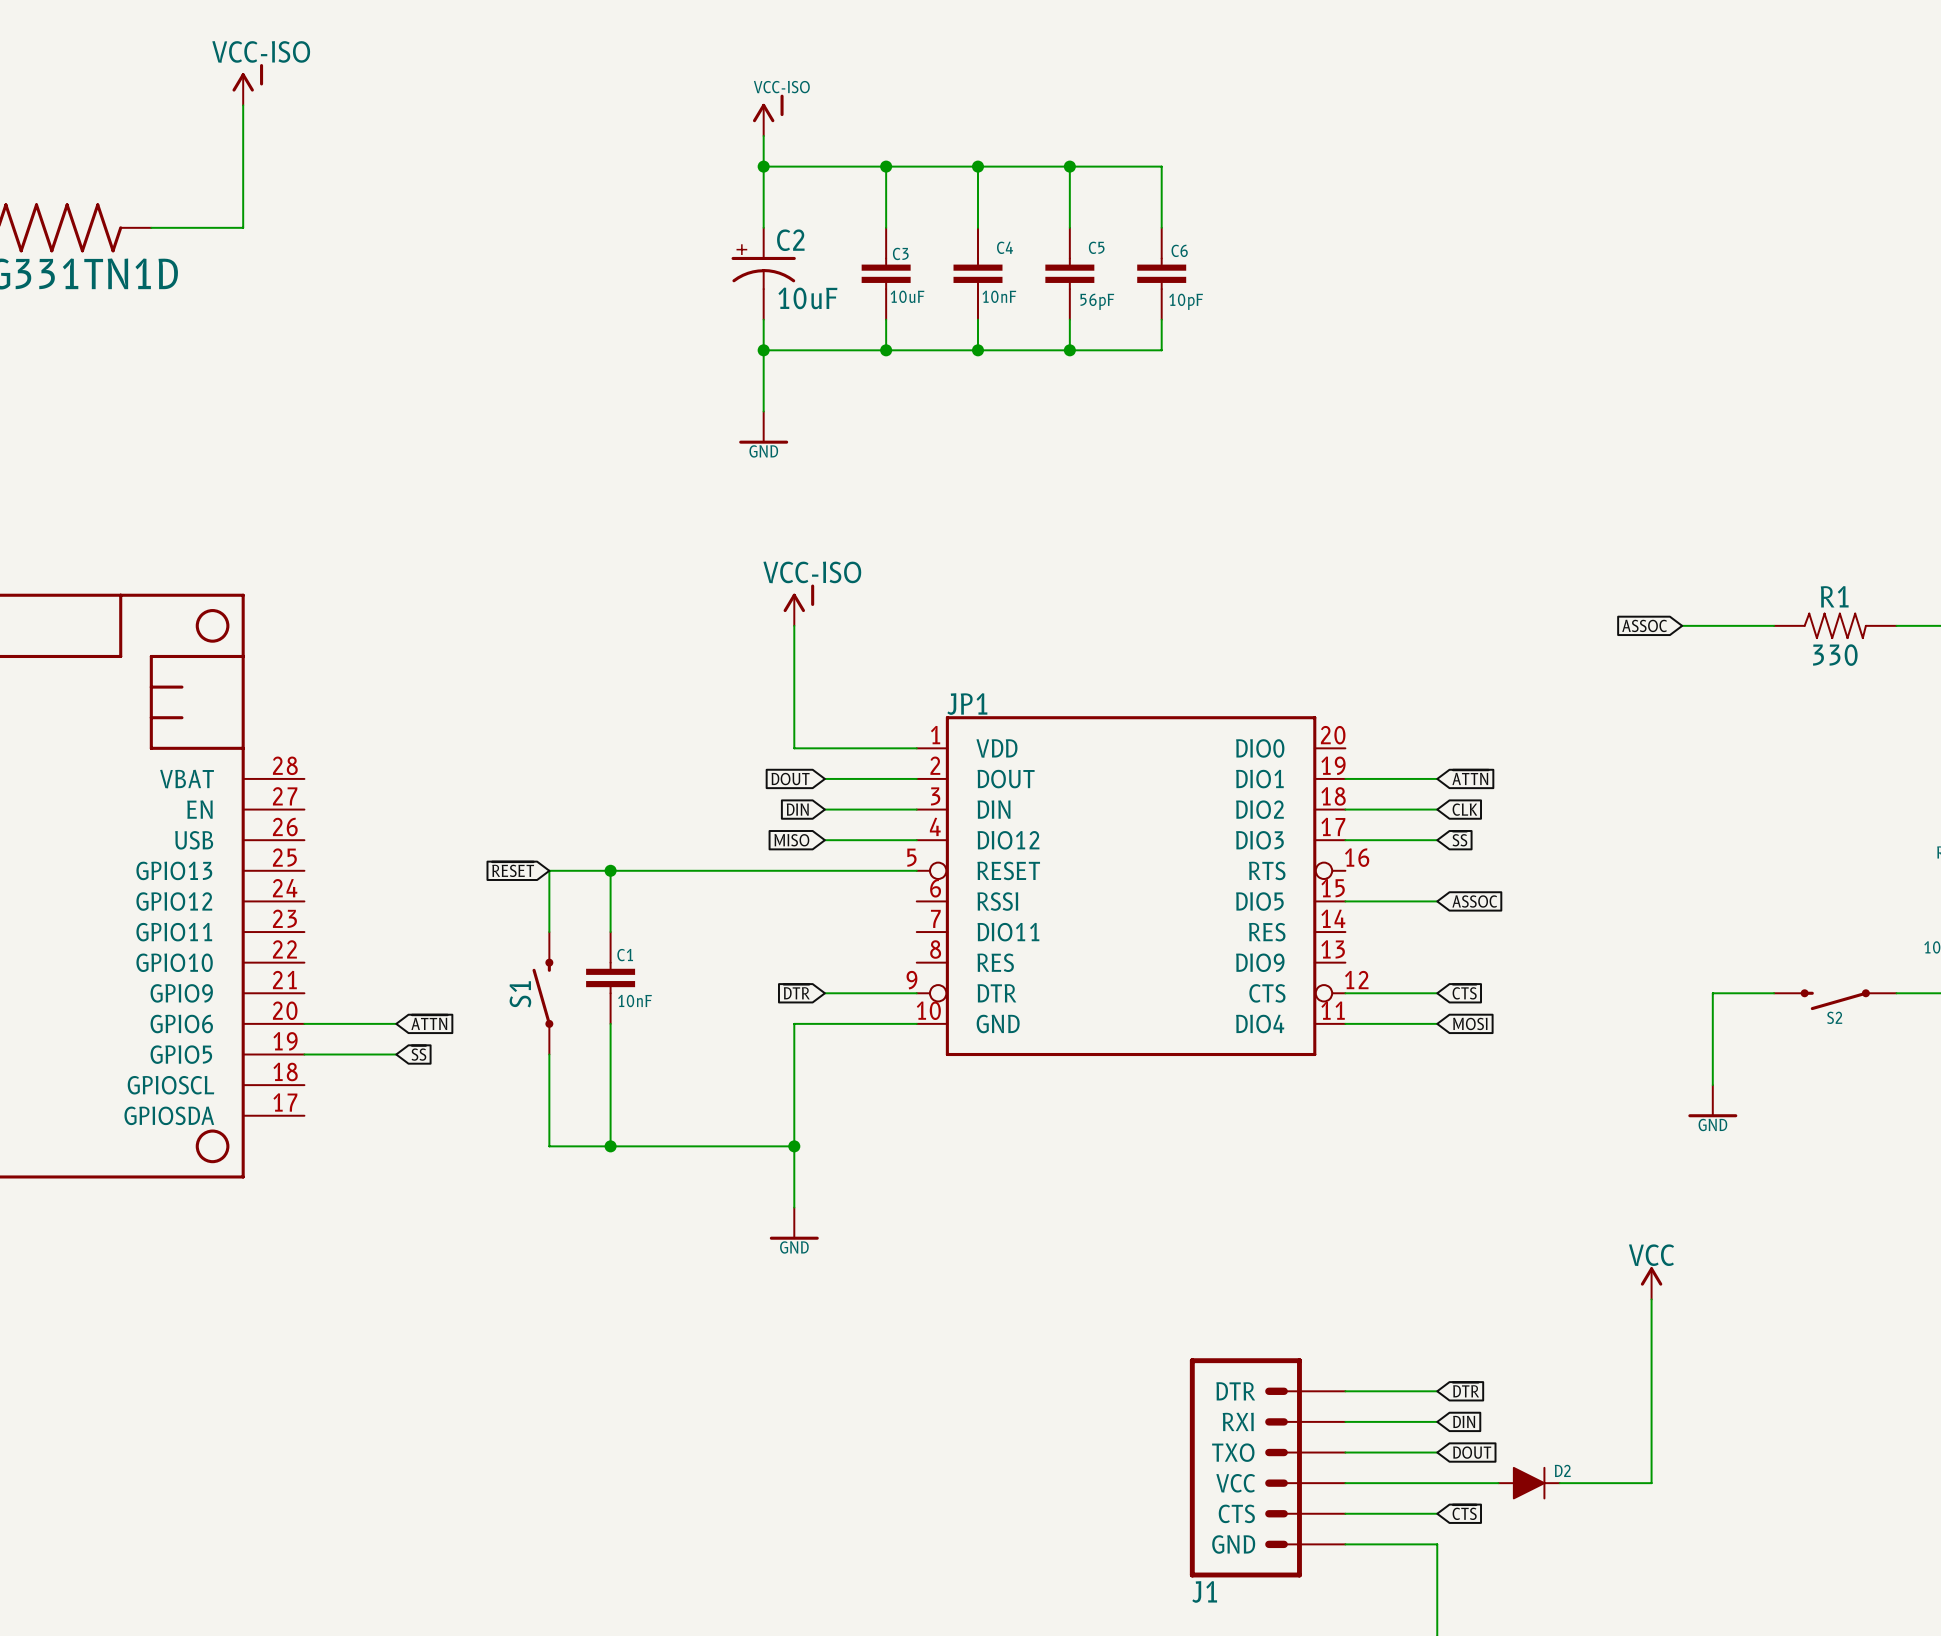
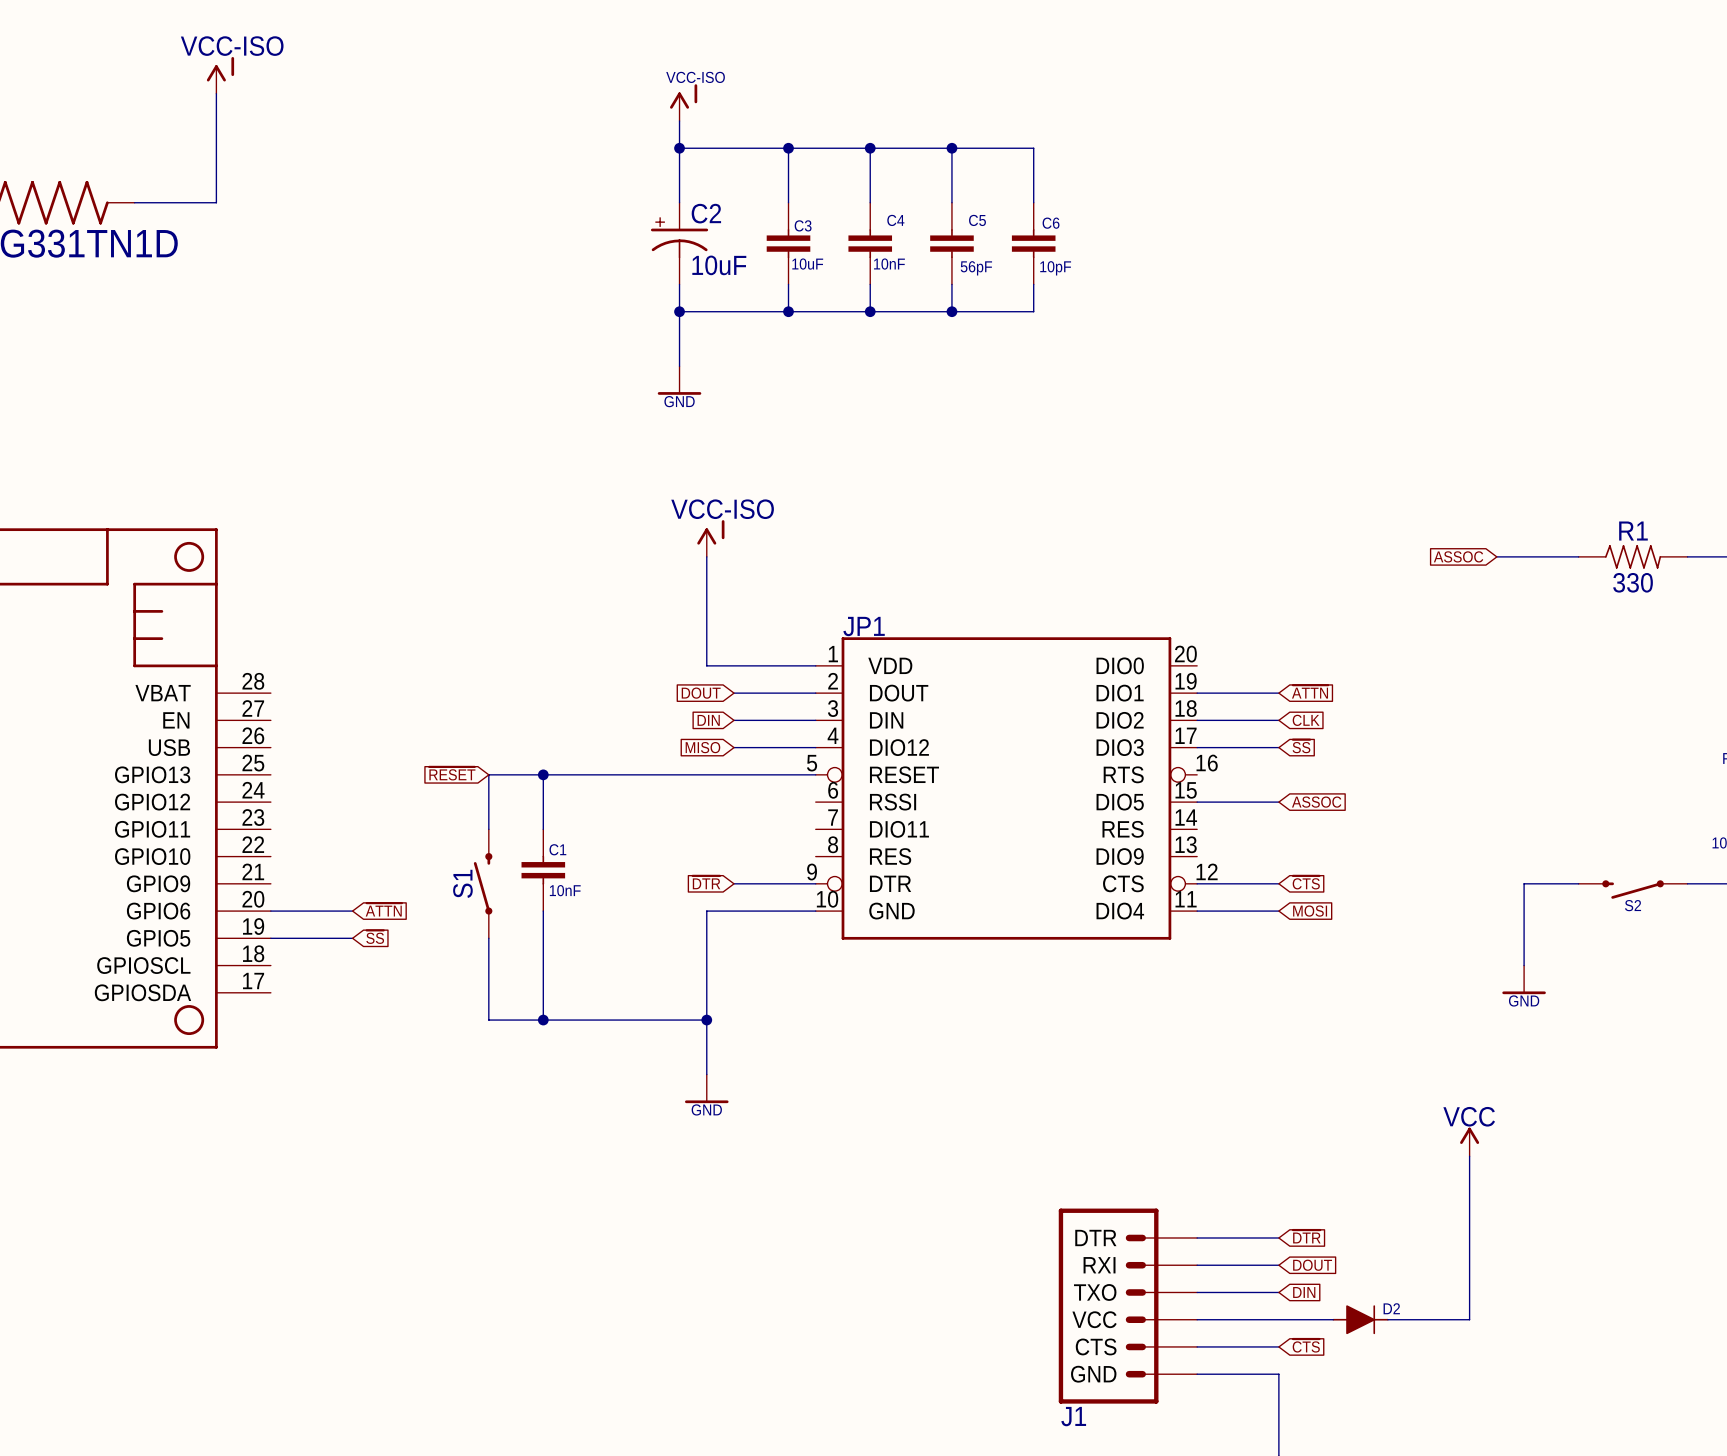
global label: DIN (1464, 1421) -> DOUT (1312, 1265)
global label: DOUT (1472, 1452) -> DIN (1304, 1292)

